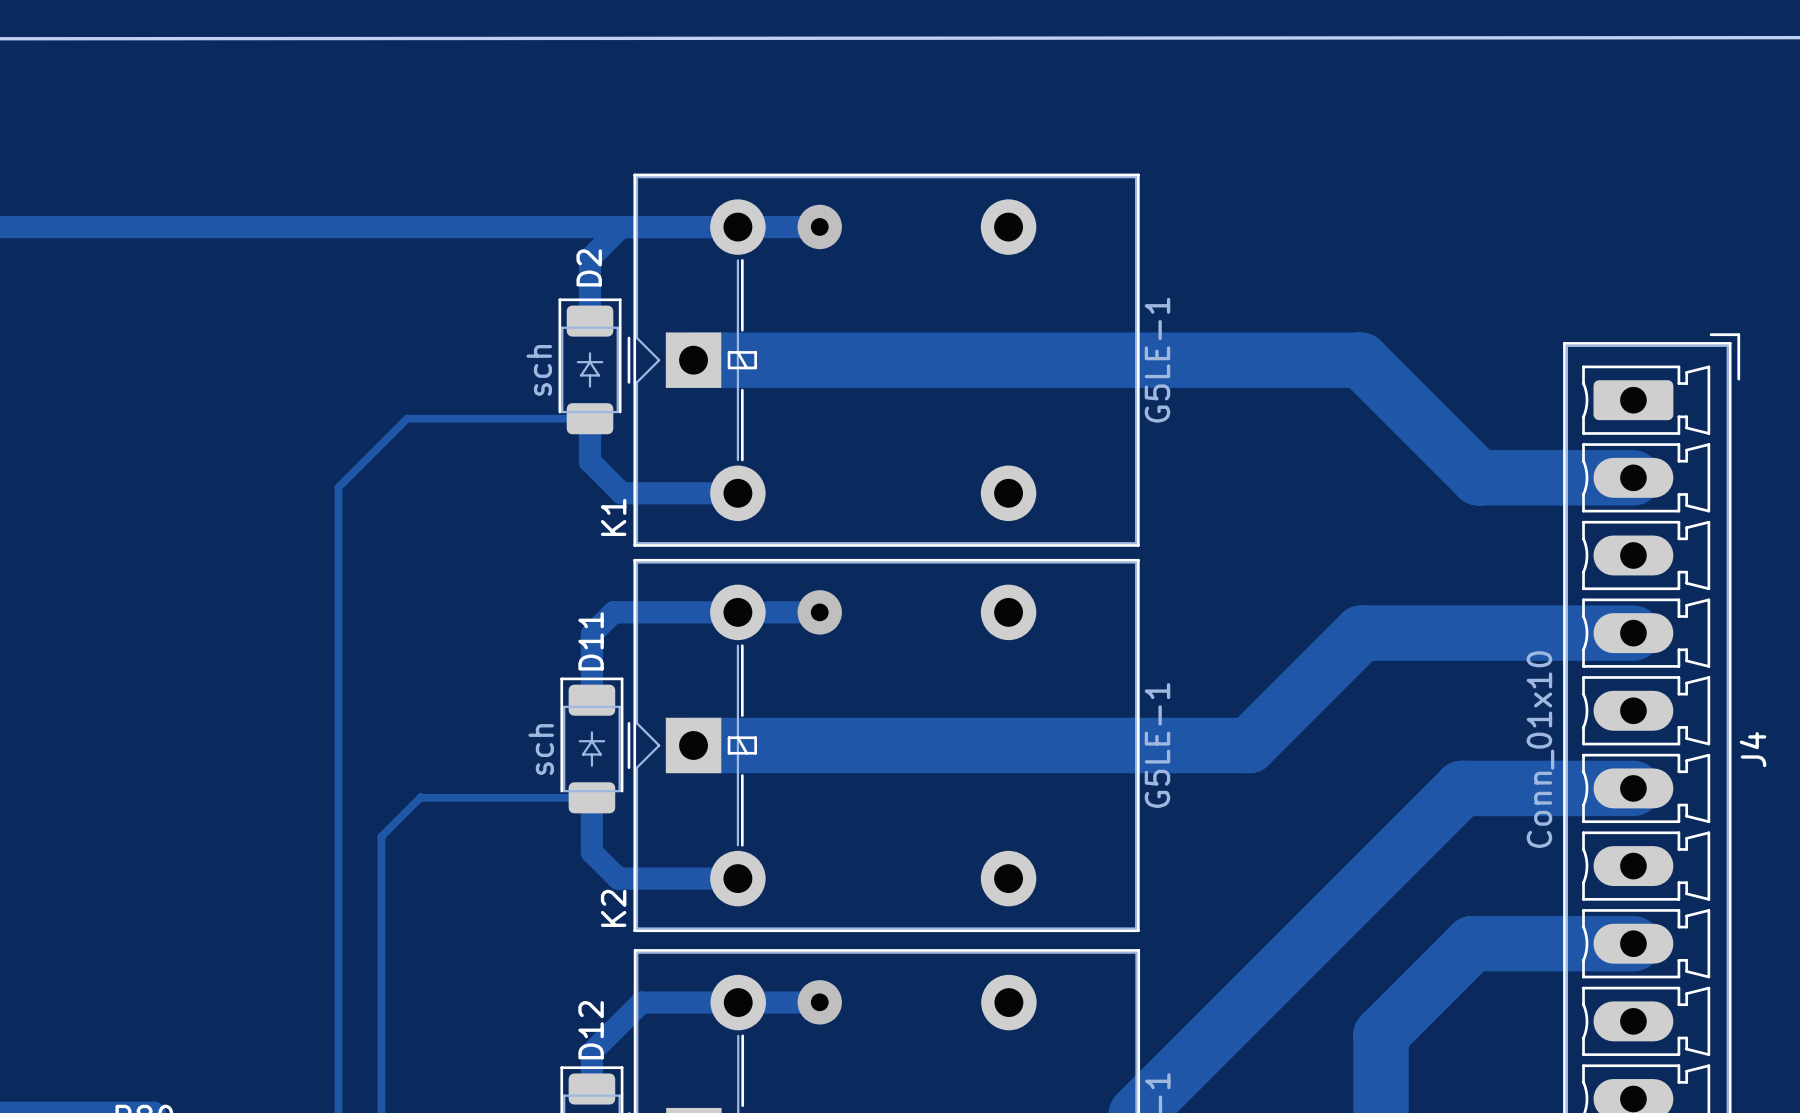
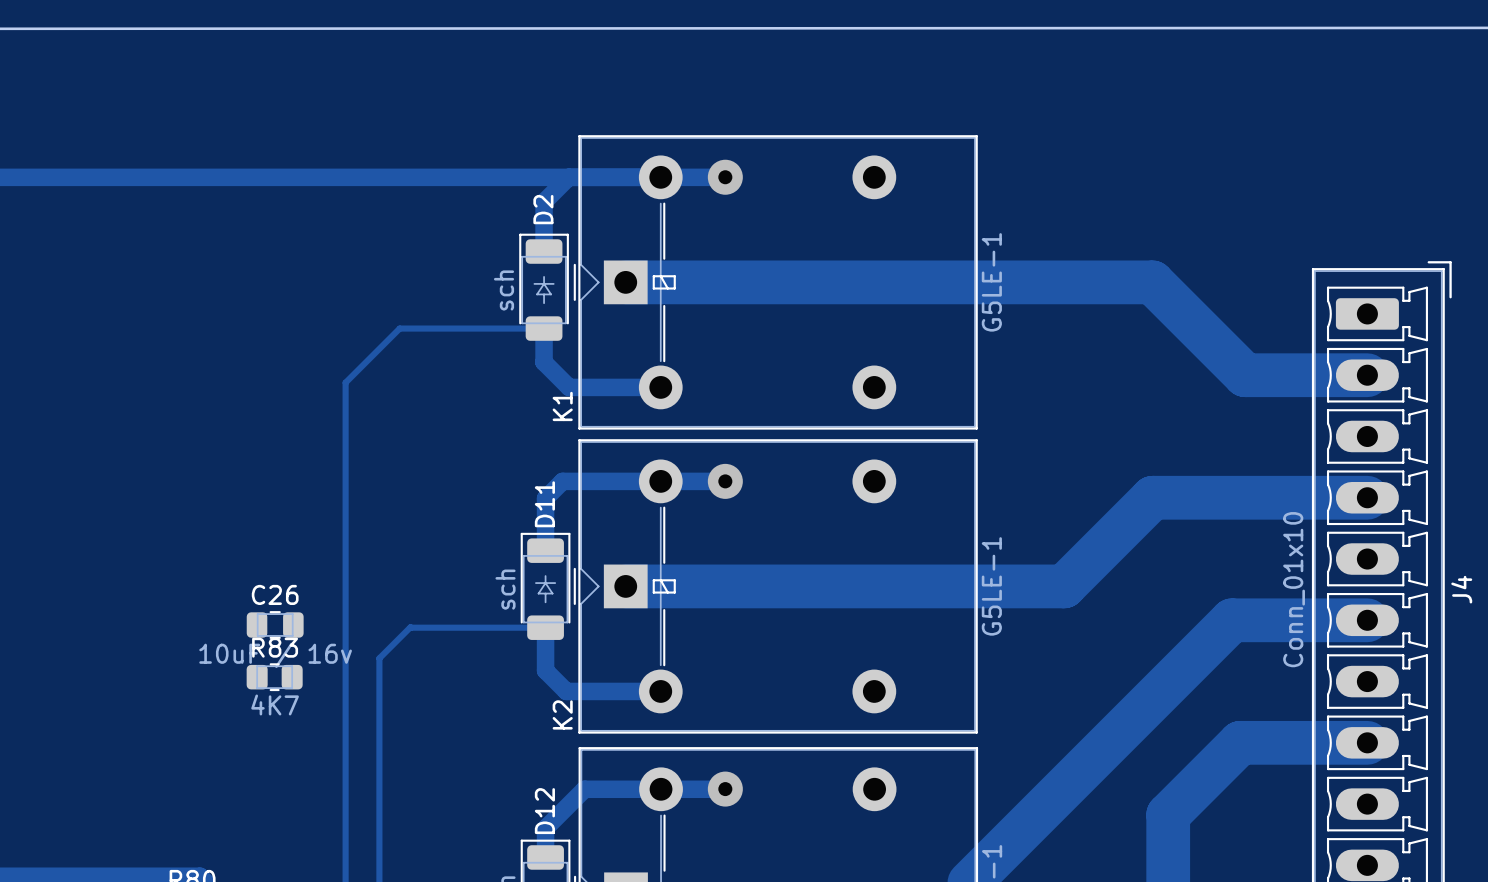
C26: none -> 10uF / 16v (275, 625)
R83: none -> 4K7 (274, 677)

